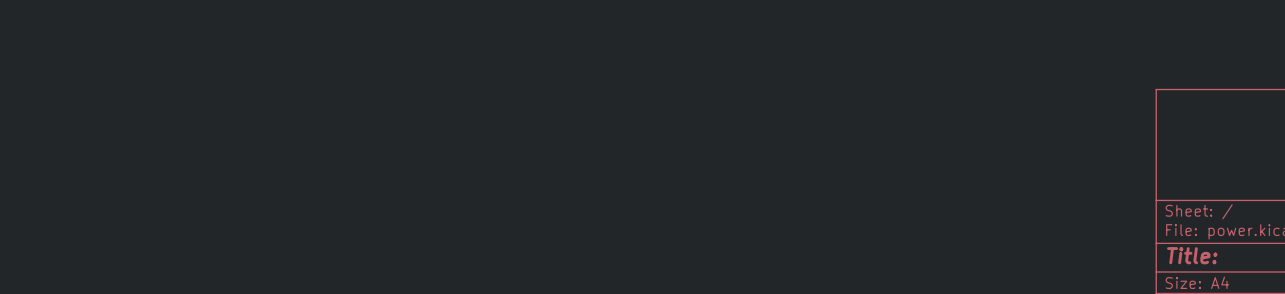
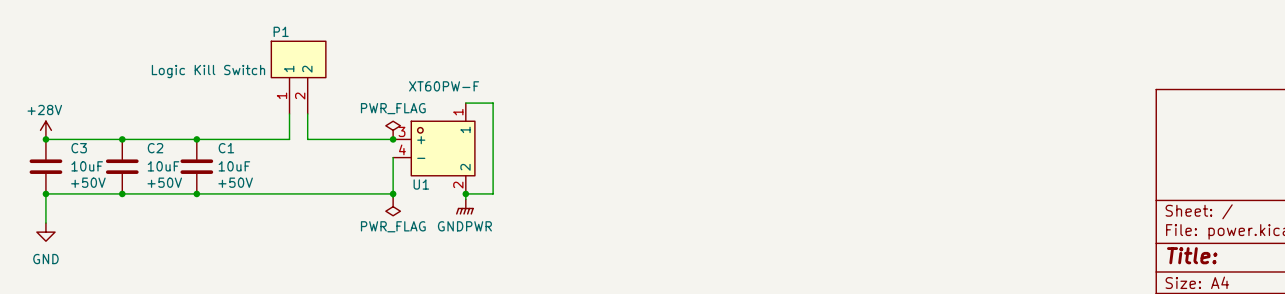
P1: none -> Logic Kill Switch (298, 77)
wire: none -> (465, 103) (493, 103) (493, 193) (465, 193) (465, 199)
wire: none -> (289, 113) (289, 139) (45, 139)
wire: none -> (307, 113) (307, 139) (393, 139)
power symbol: none -> +28V (45, 130)
power symbol: none -> PWR_FLAG (393, 130)
junction: none -> (45, 139)
junction: none -> (122, 139)
junction: none -> (196, 139)
junction: none -> (393, 139)
U1: none -> XT60PW-F (434, 148)
wire: none -> (393, 157) (393, 197)
C3: none -> 10uF (45, 166)
C2: none -> 10uF (122, 166)
C1: none -> 10uF (196, 166)
junction: none -> (45, 193)
junction: none -> (122, 193)
junction: none -> (196, 193)
wire: none -> (393, 193) (45, 193) (45, 223)
junction: none -> (393, 193)
junction: none -> (465, 193)
power symbol: none -> PWR_FLAG (393, 206)
power symbol: none -> GNDPWR (464, 207)
power symbol: none -> GND (45, 232)

